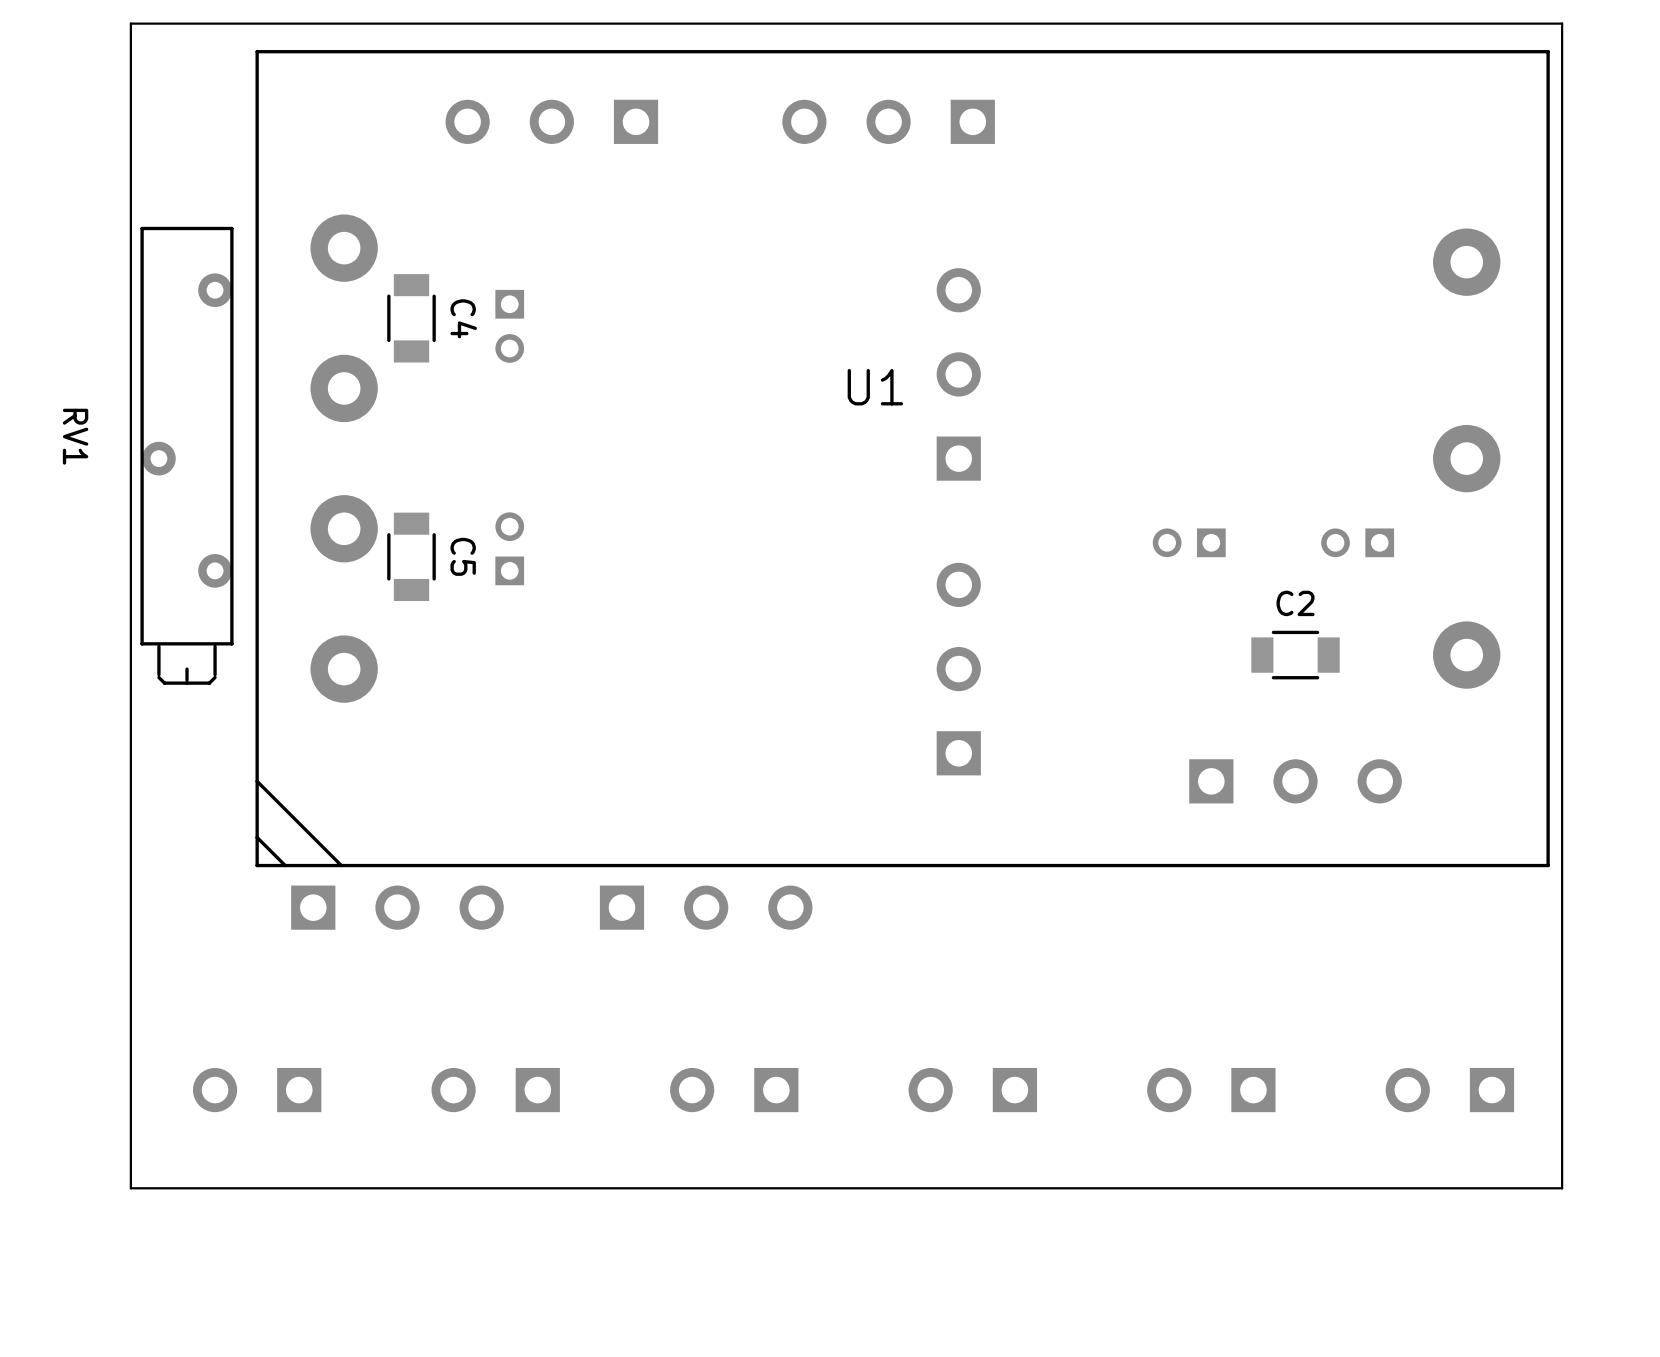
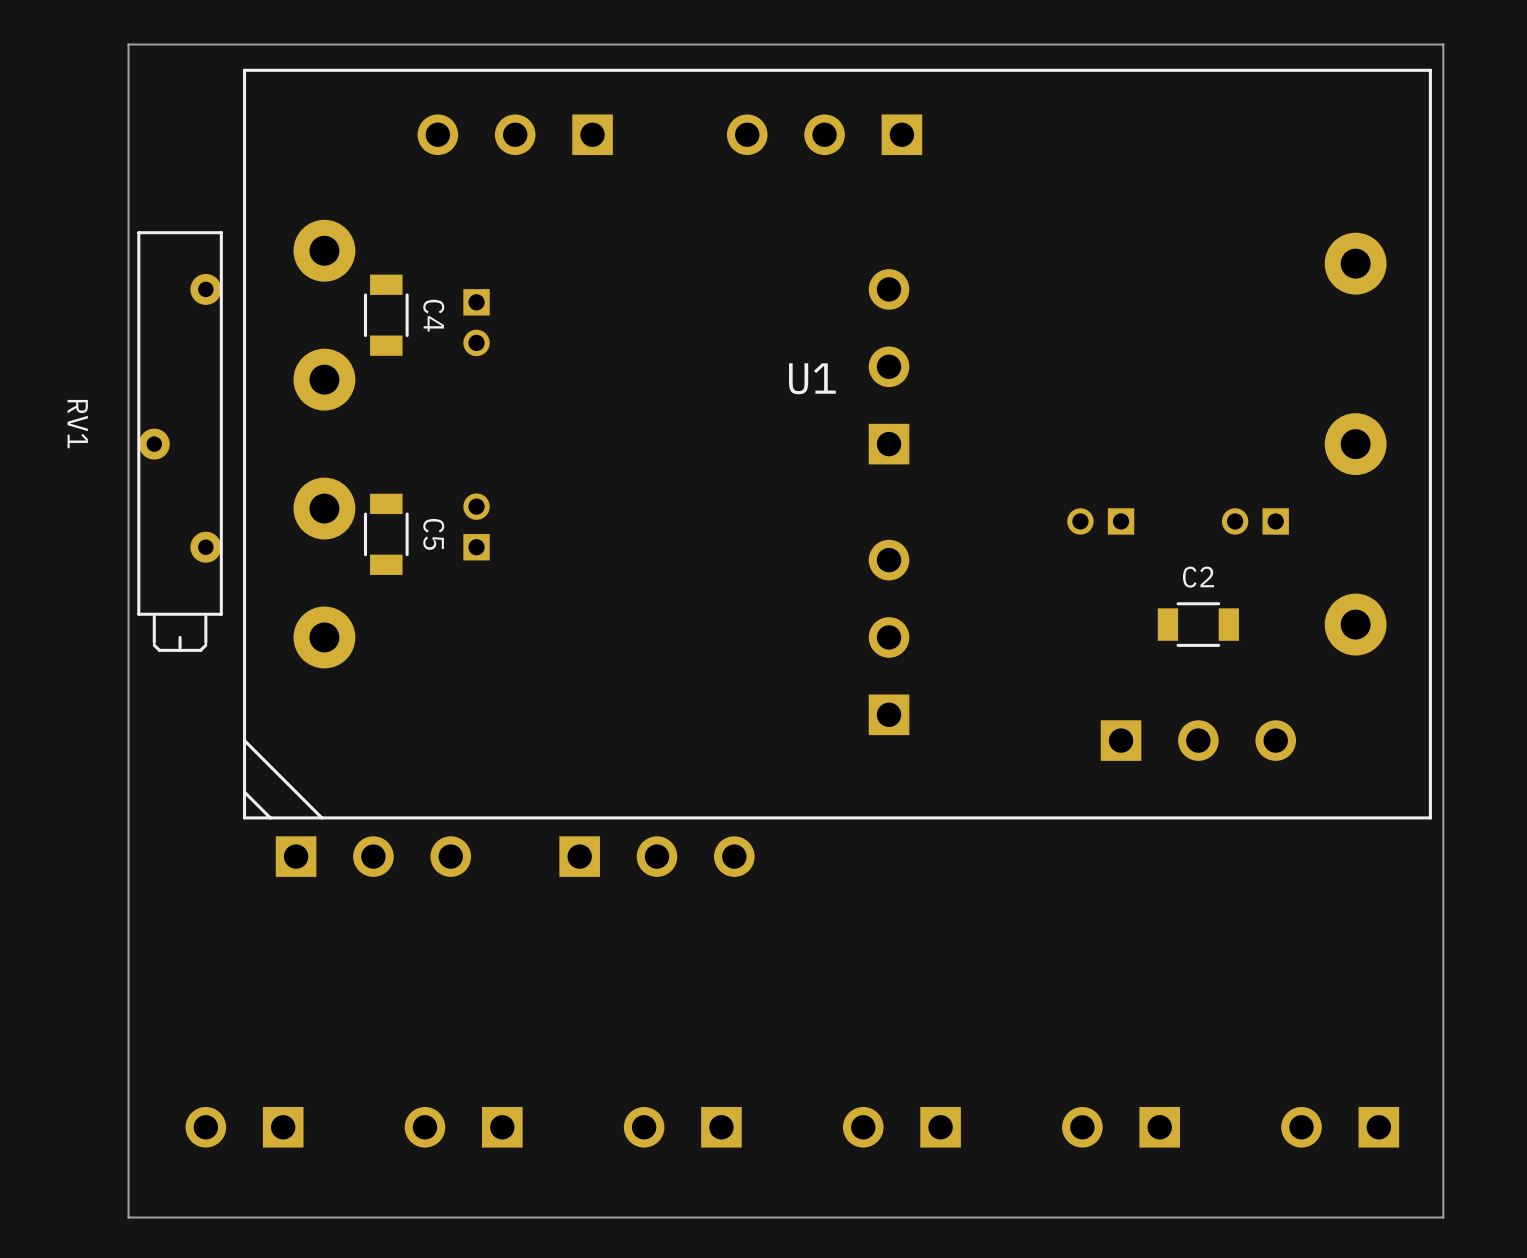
part position: (257, 1090) -> (244, 1127)
part position: (495, 1090) -> (463, 1127)
part position: (734, 1090) -> (682, 1127)
part position: (972, 1090) -> (901, 1127)
part position: (1211, 1090) -> (1121, 1127)
part position: (1449, 1090) -> (1340, 1127)
board edge: (1562, 1188) (130, 1188) -> (1443, 1114) (1443, 1217) (128, 1217) (128, 1114)

